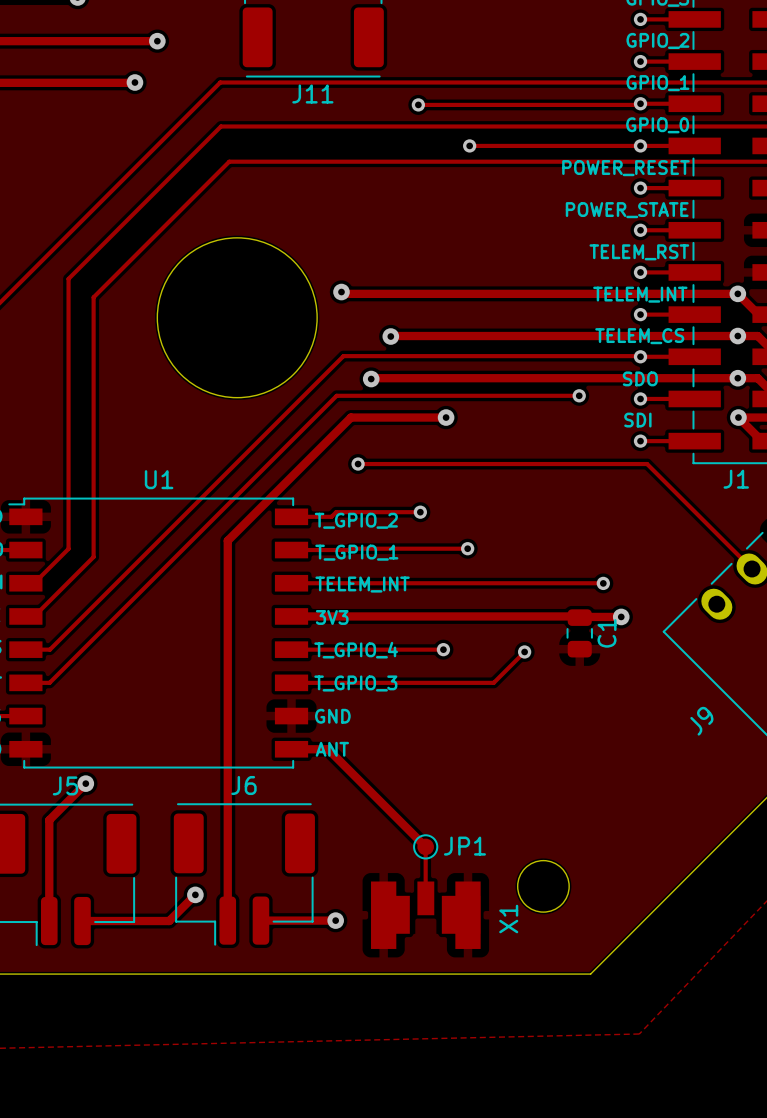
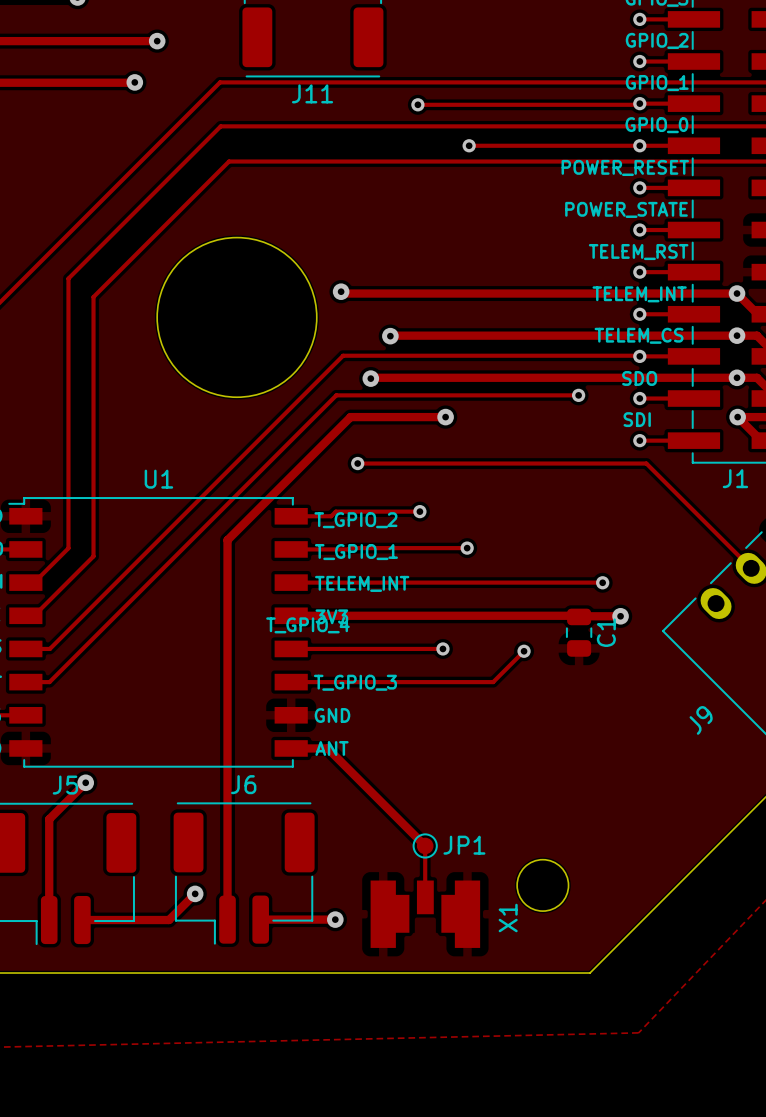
text position: T_GPIO_4 (356, 650) -> T_GPIO_4 (307, 625)

